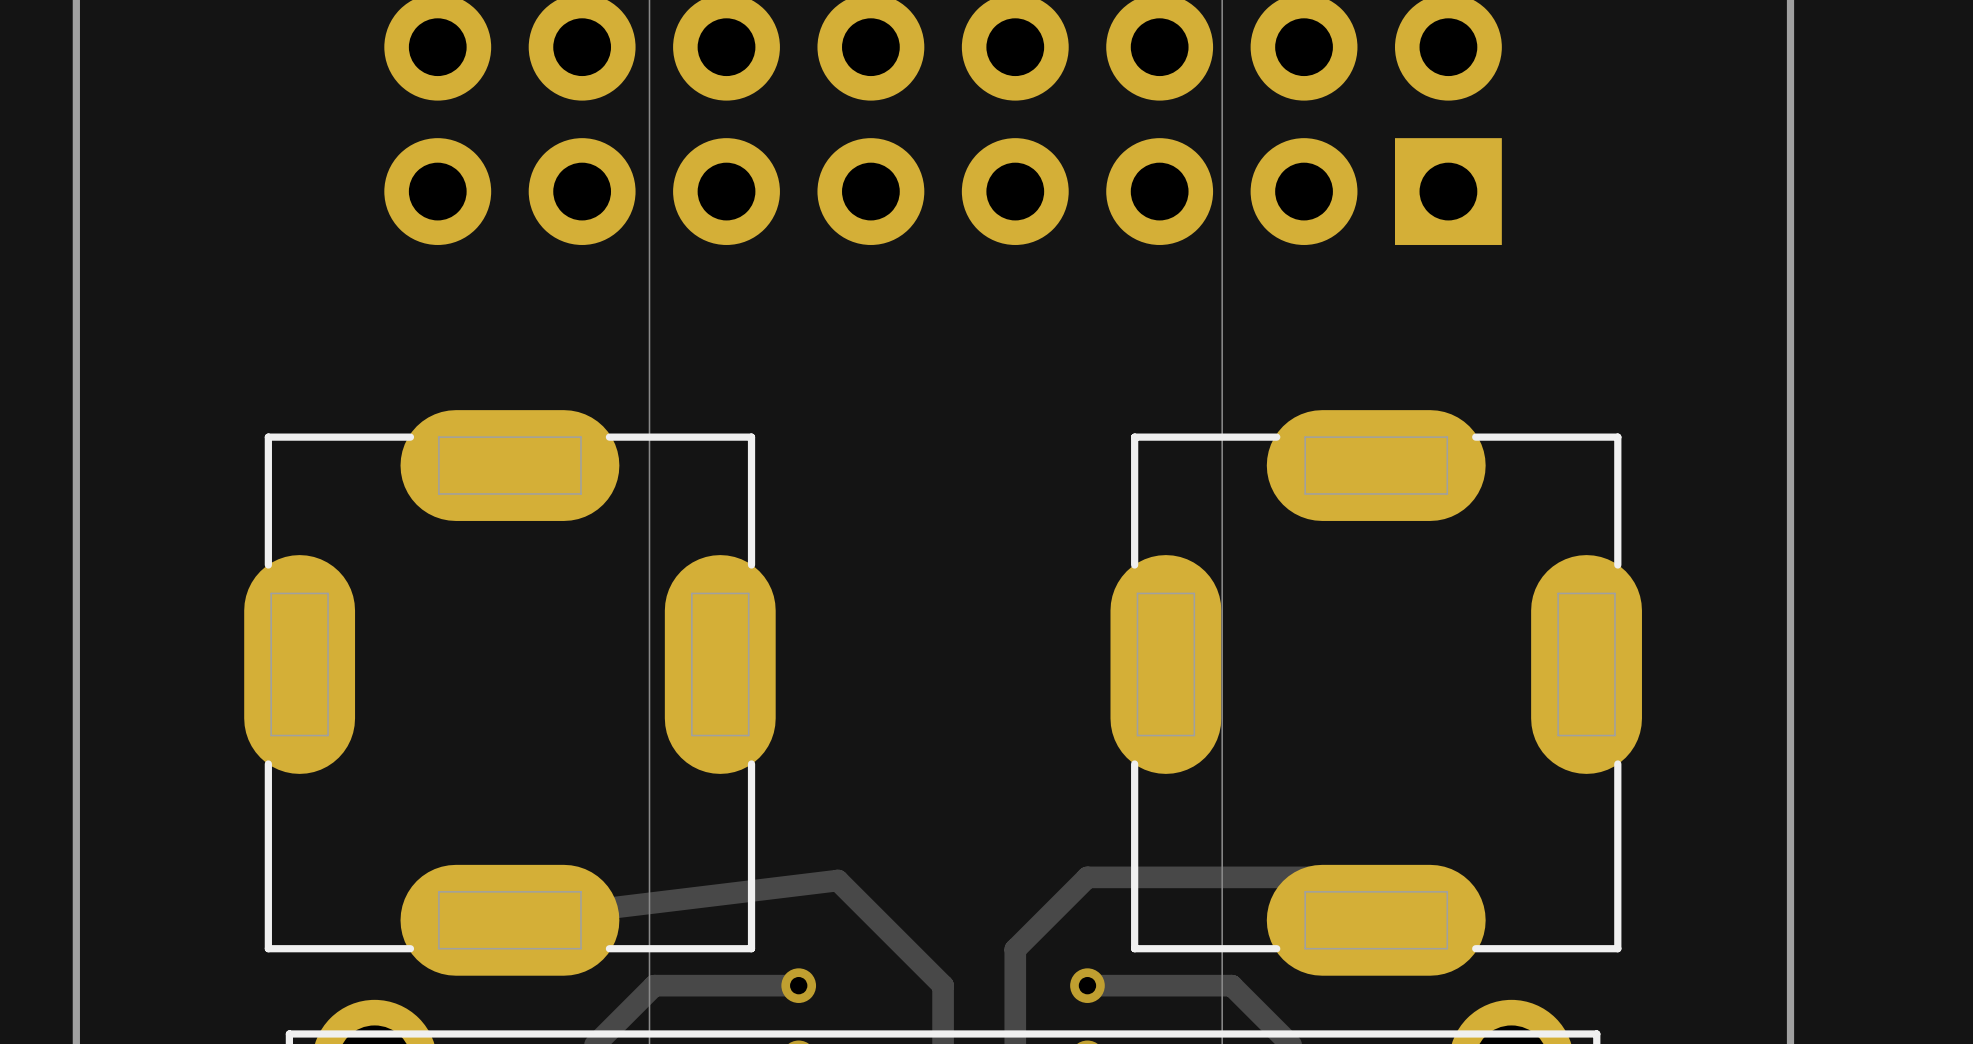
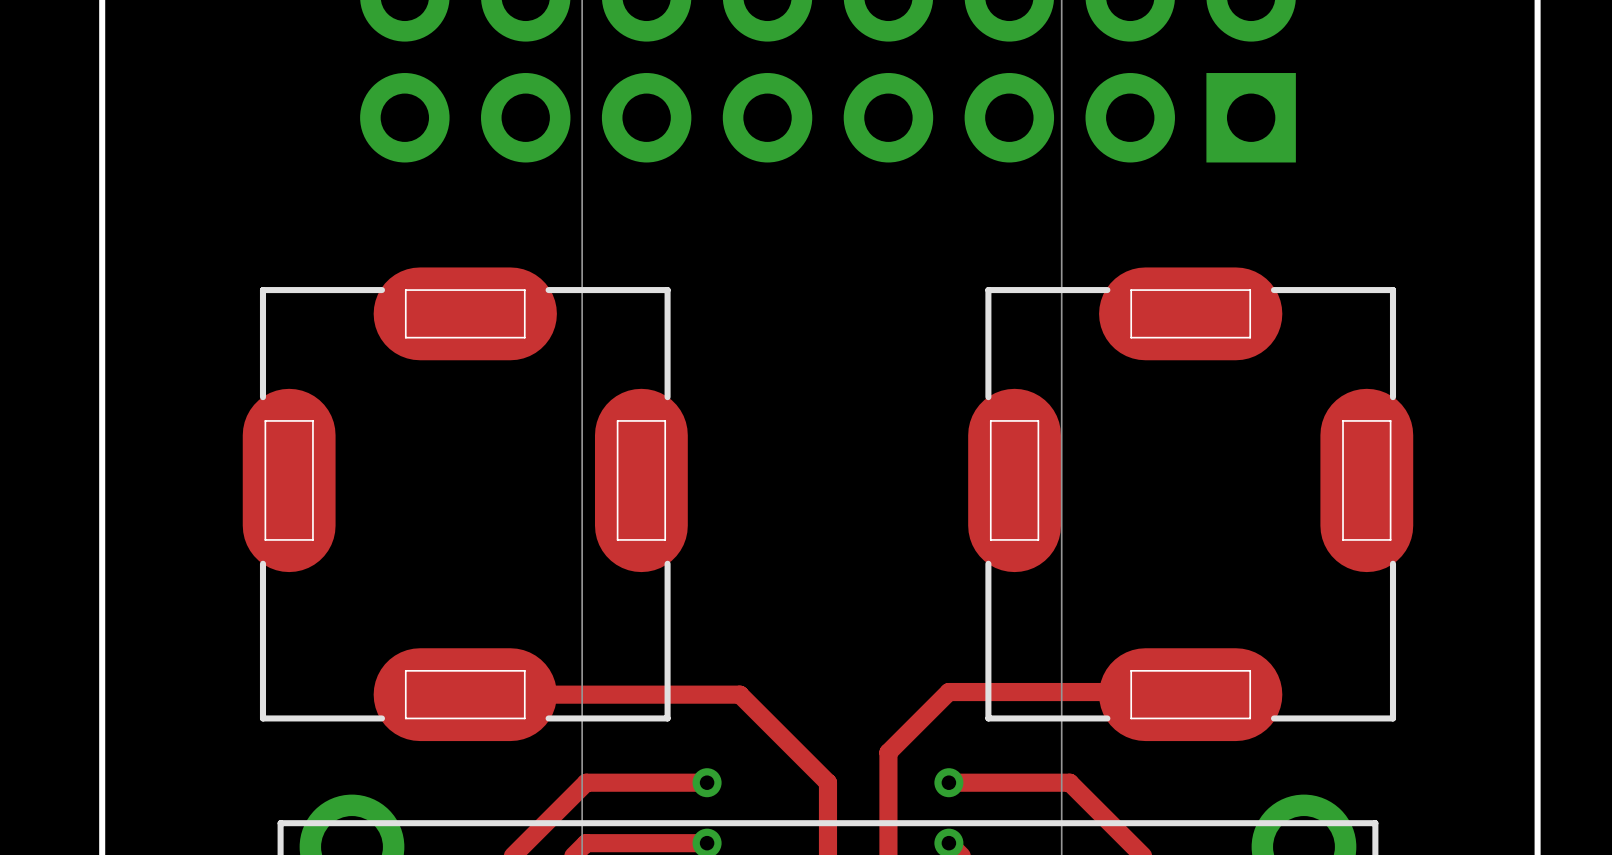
part position: (509, 692) -> (465, 504)
part position: (1376, 692) -> (1190, 504)
track: (837, 880) (509, 920) -> (739, 694) (465, 694)

